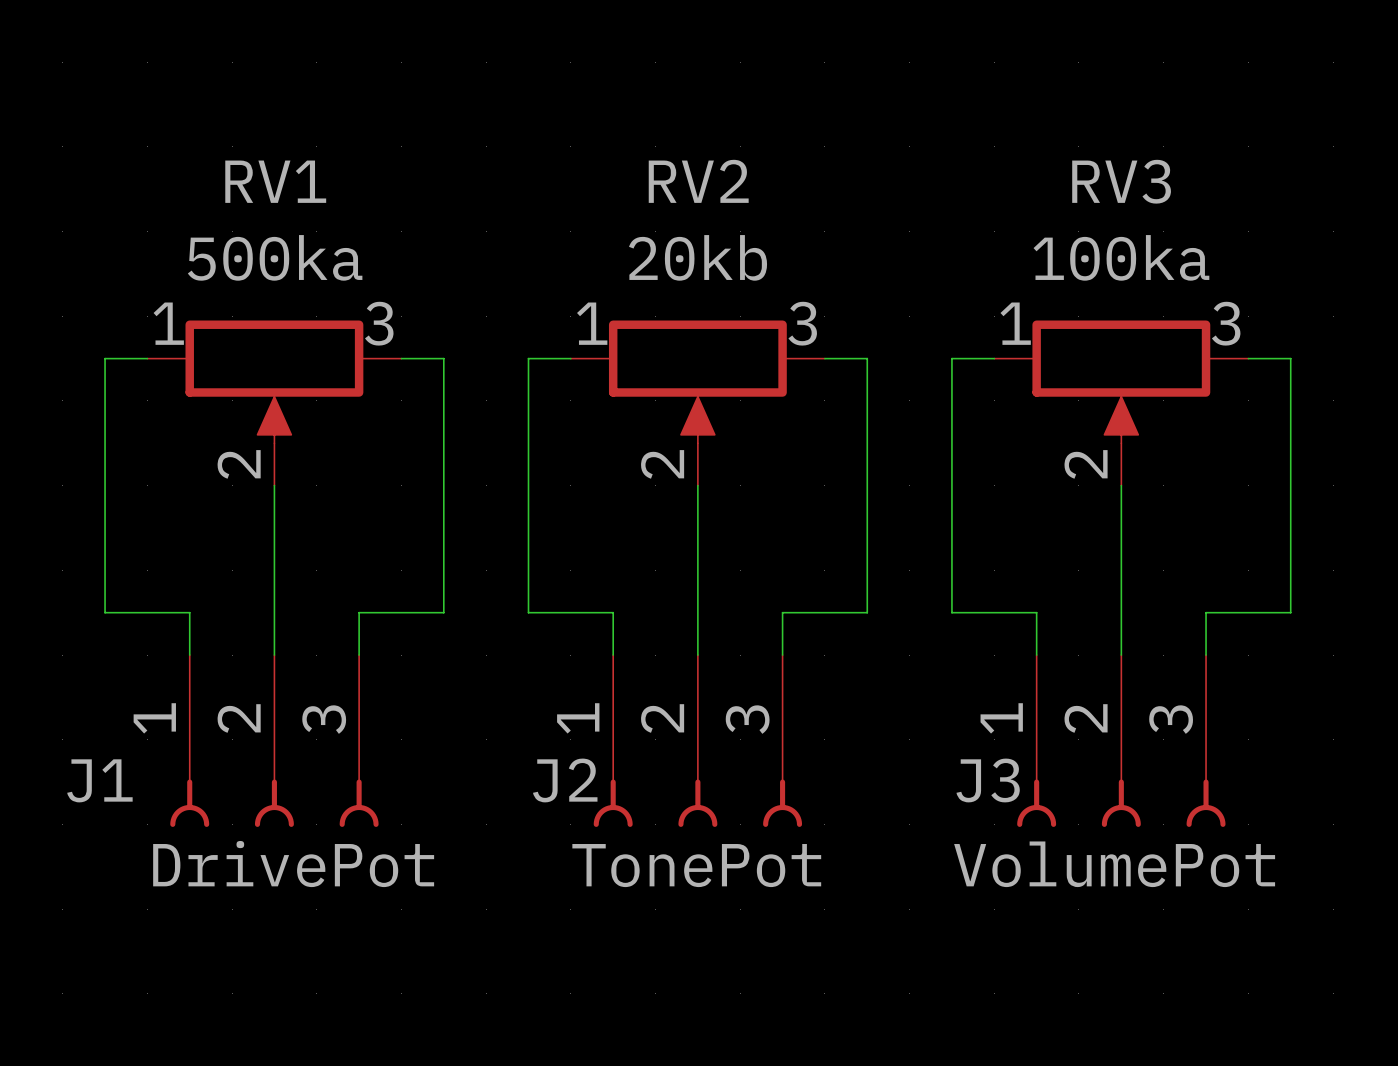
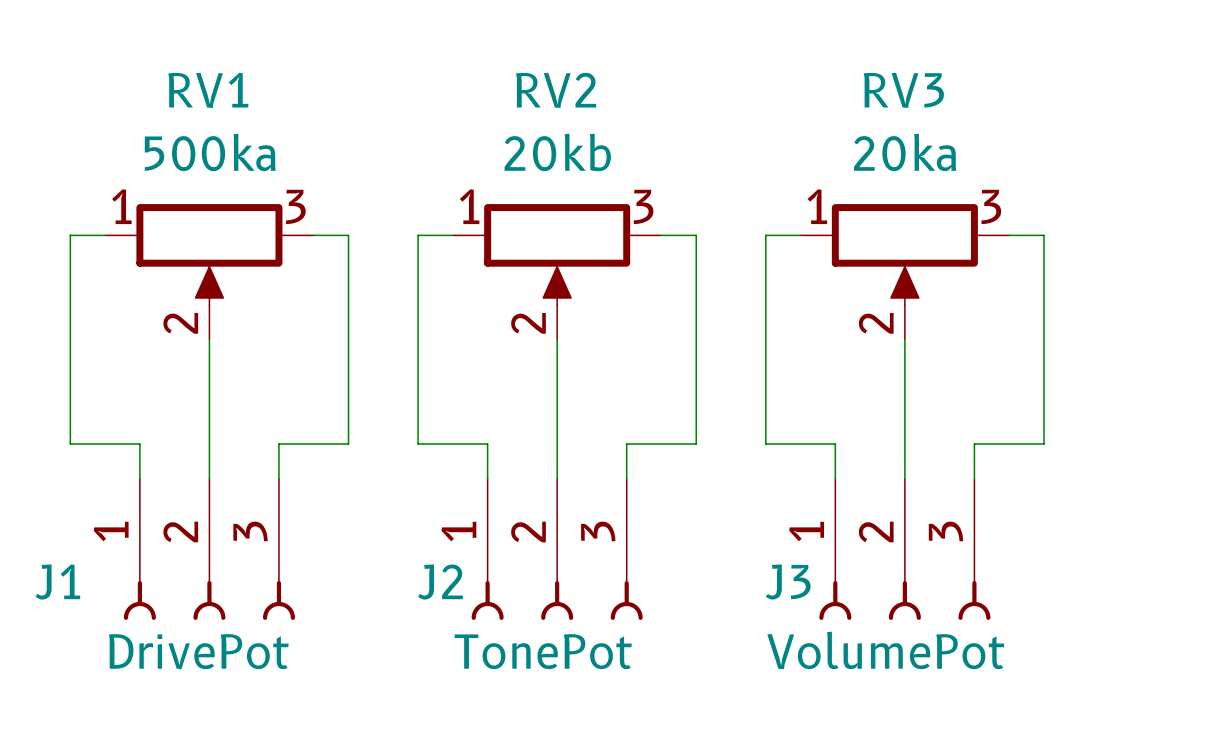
RV3 value: 100ka (1121, 257) -> 20ka (905, 152)

